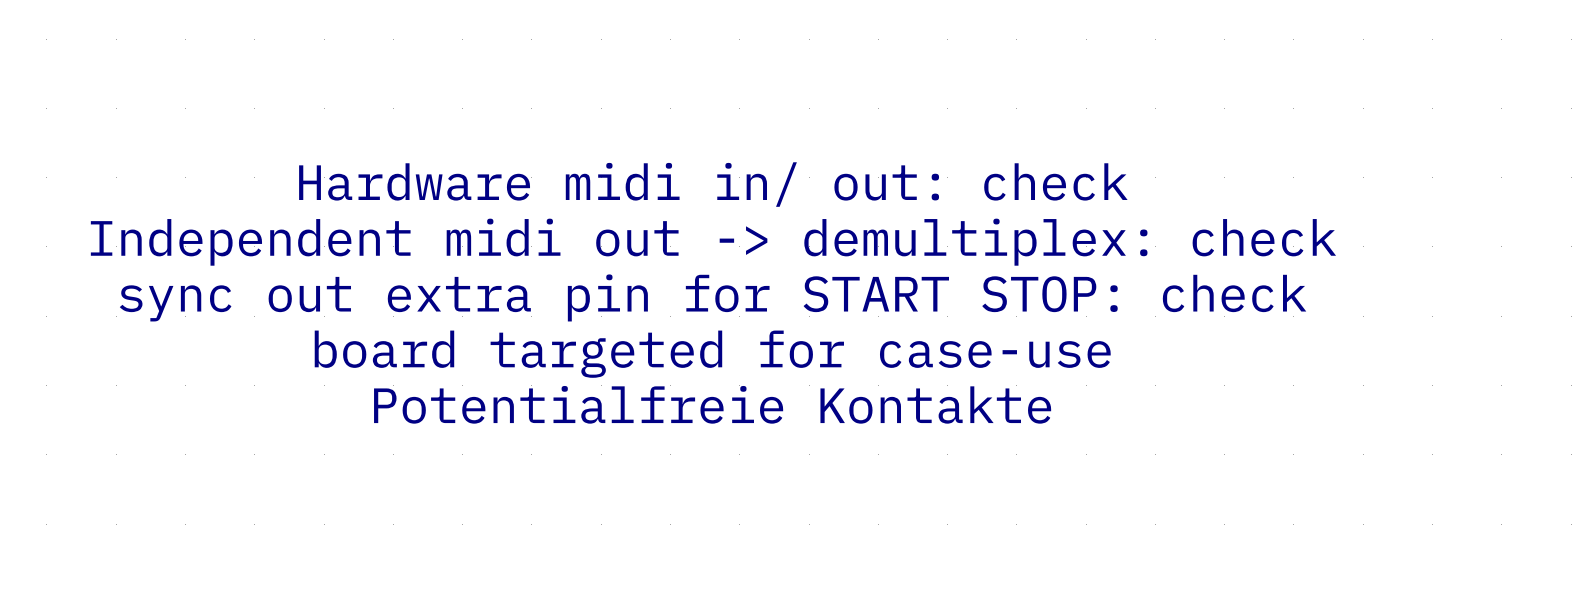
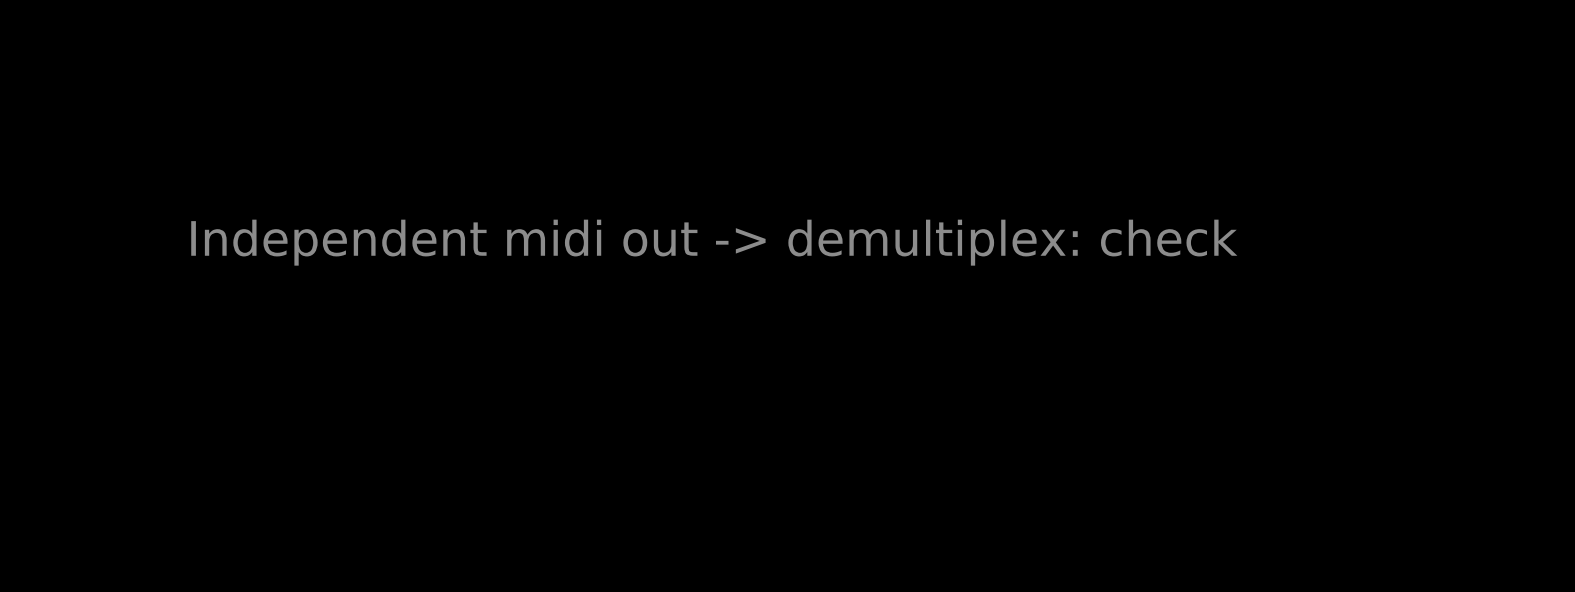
text: Hardware midi in/ out: check (713, 184) -> none
text: sync out extra pin for START STOP: check (713, 297) -> none
text: board targeted for case-use (712, 354) -> none
text: Potentialfreie Kontakte (712, 404) -> none

